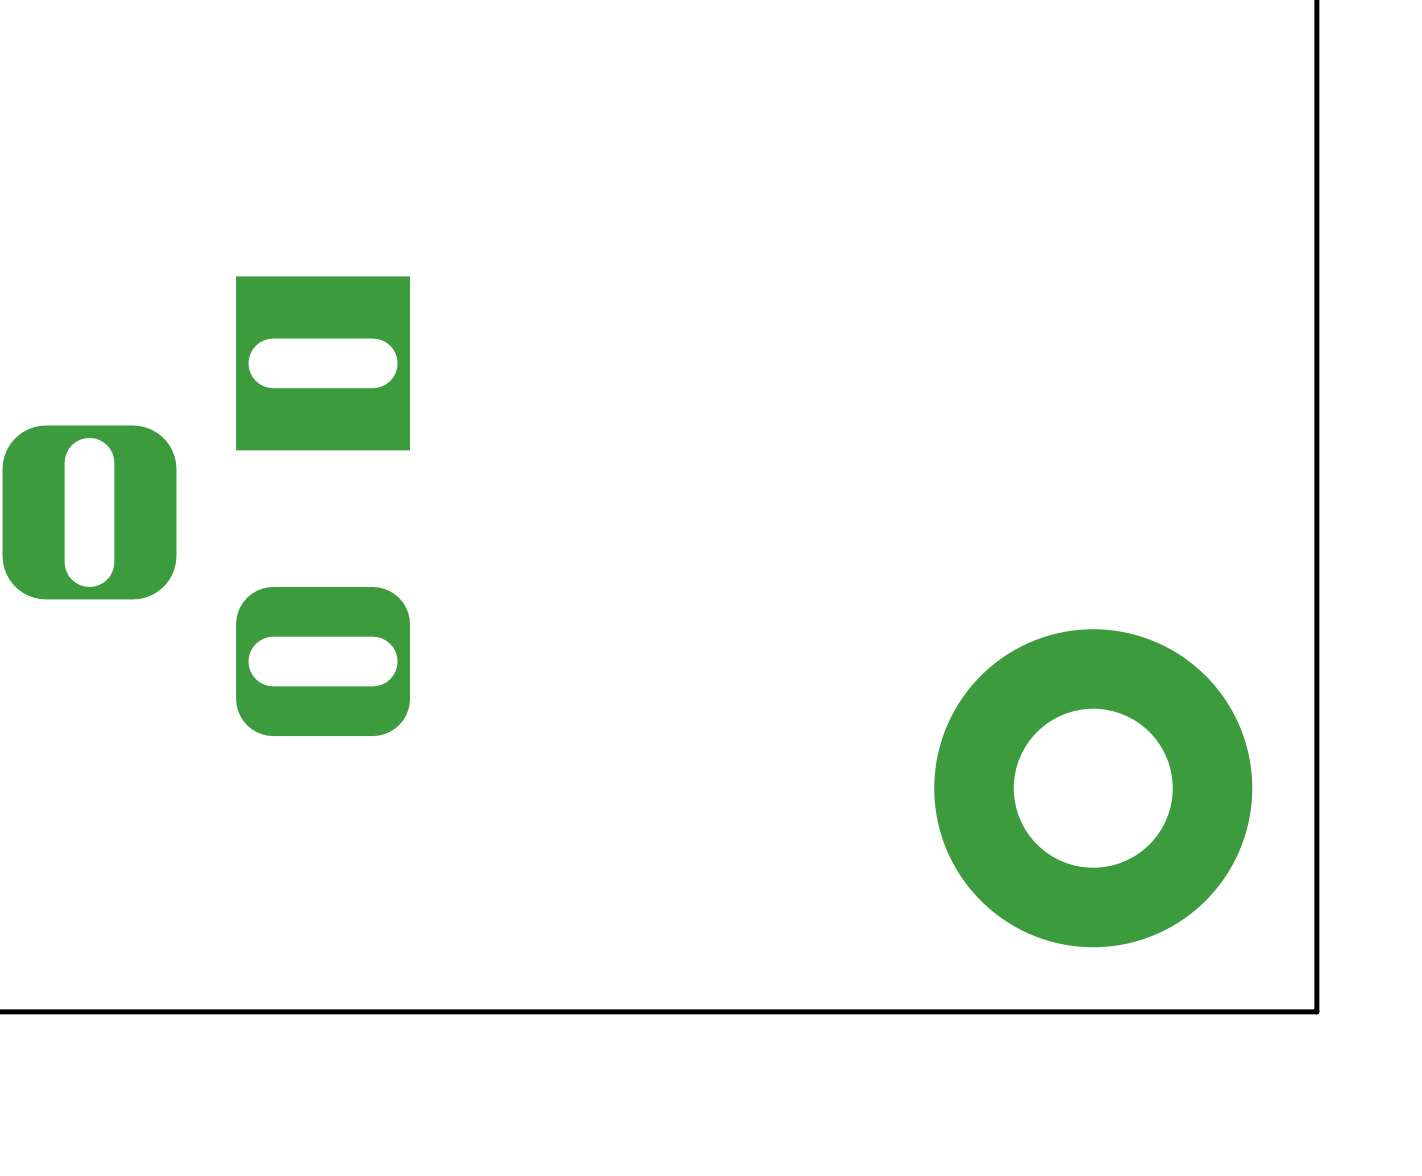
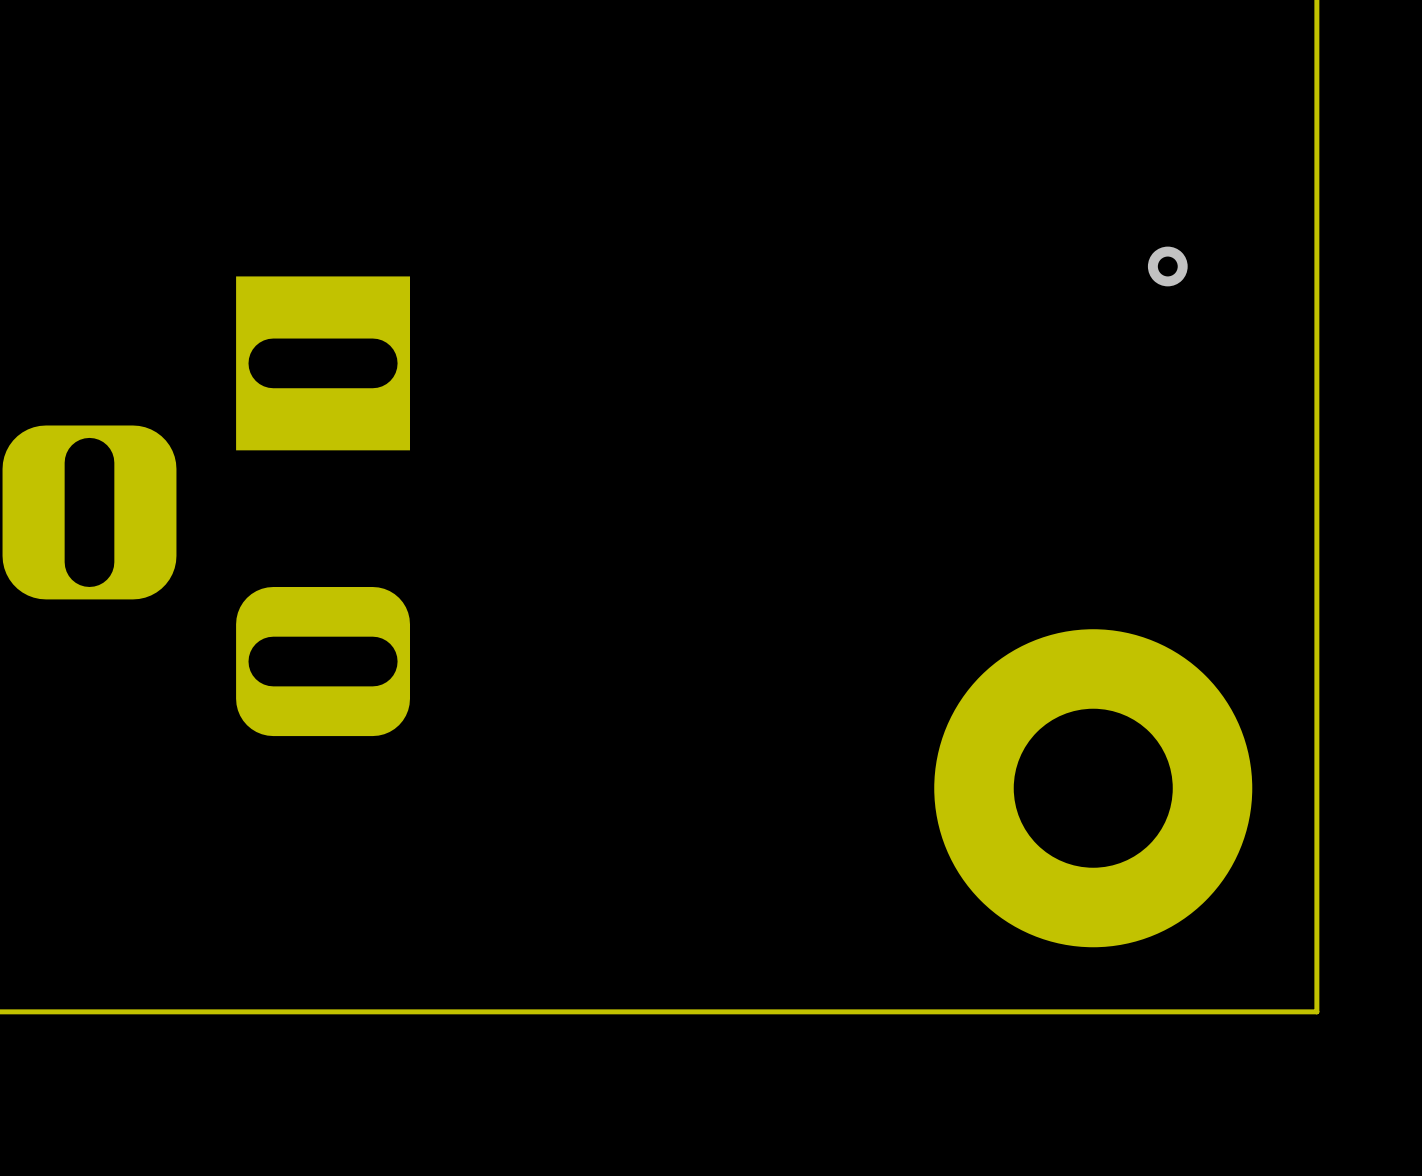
via: none -> (1167, 266)

